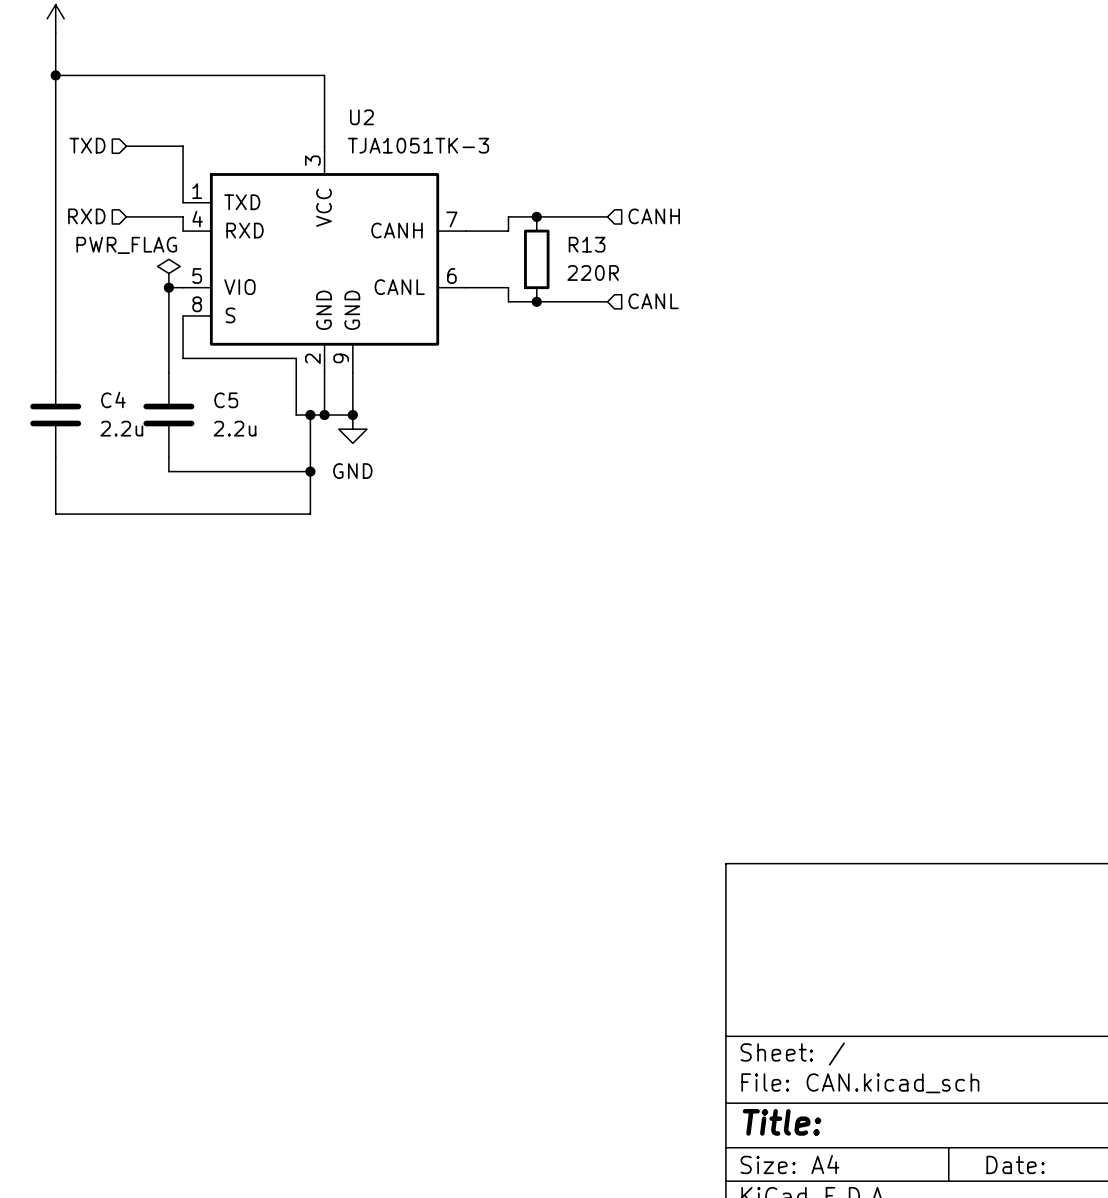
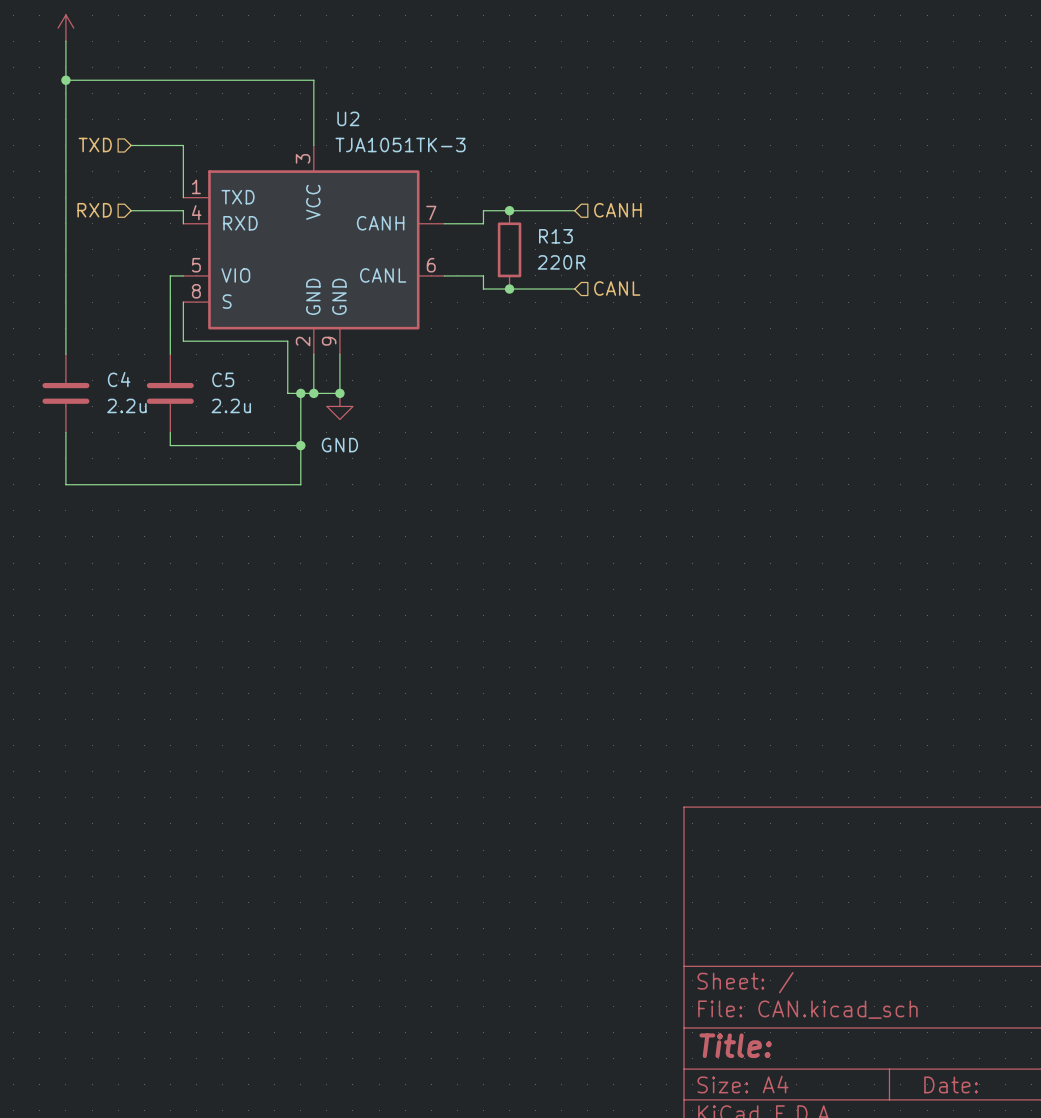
power symbol: PWR_FLAG (168, 273) -> none
junction: (168, 287) -> none

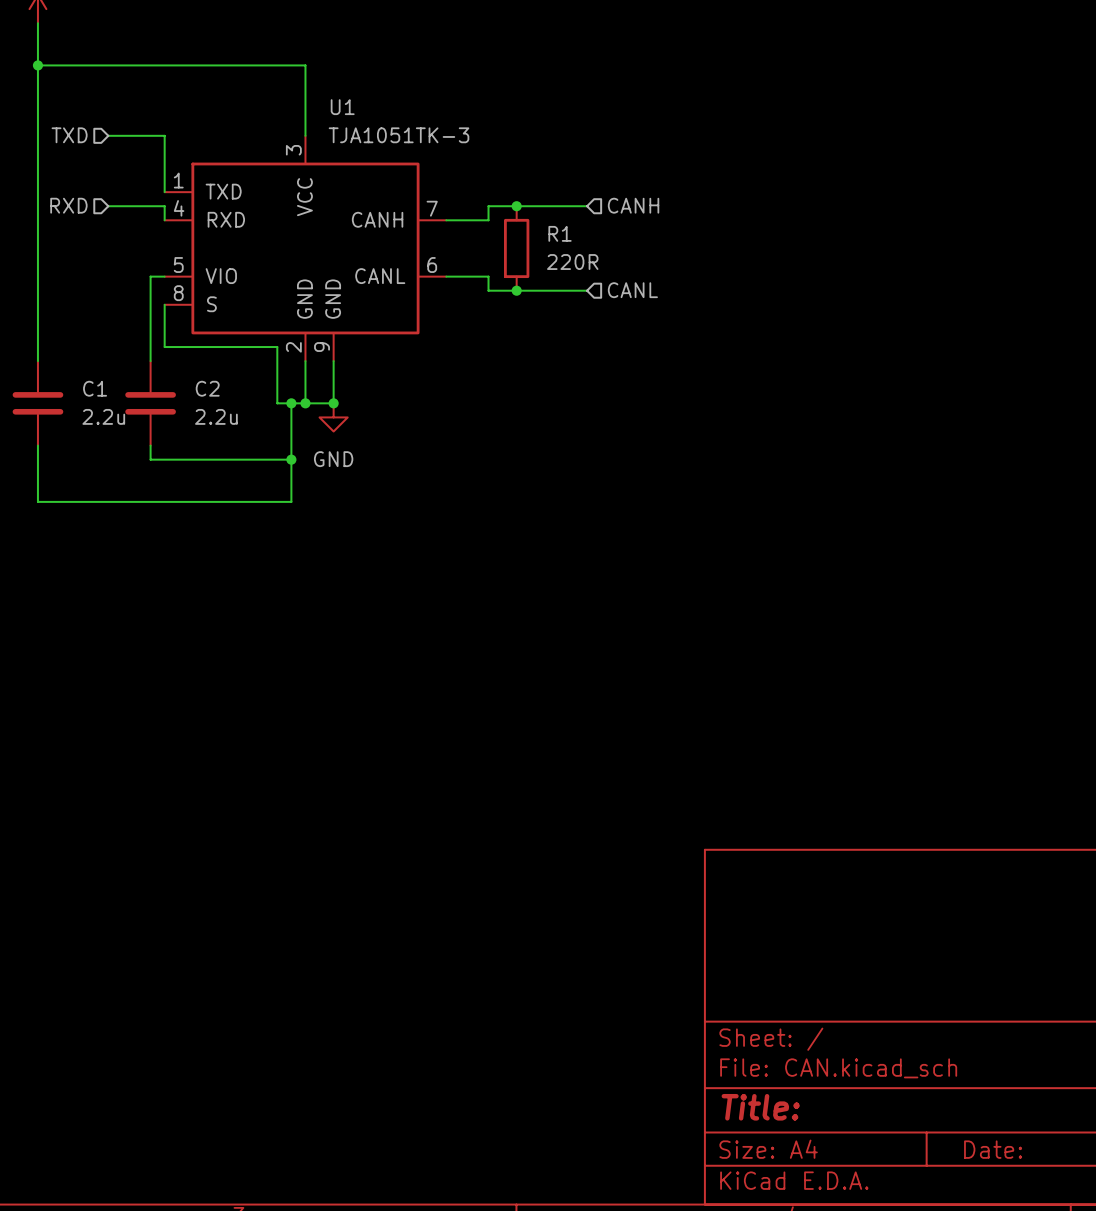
U2 name: U2 (348, 118) -> U1 (342, 107)
R13 name: R13 (555, 236) -> R1 (560, 233)
C4 name: C4 (119, 379) -> C1 (95, 388)
C5 name: C5 (223, 379) -> C2 (207, 388)

